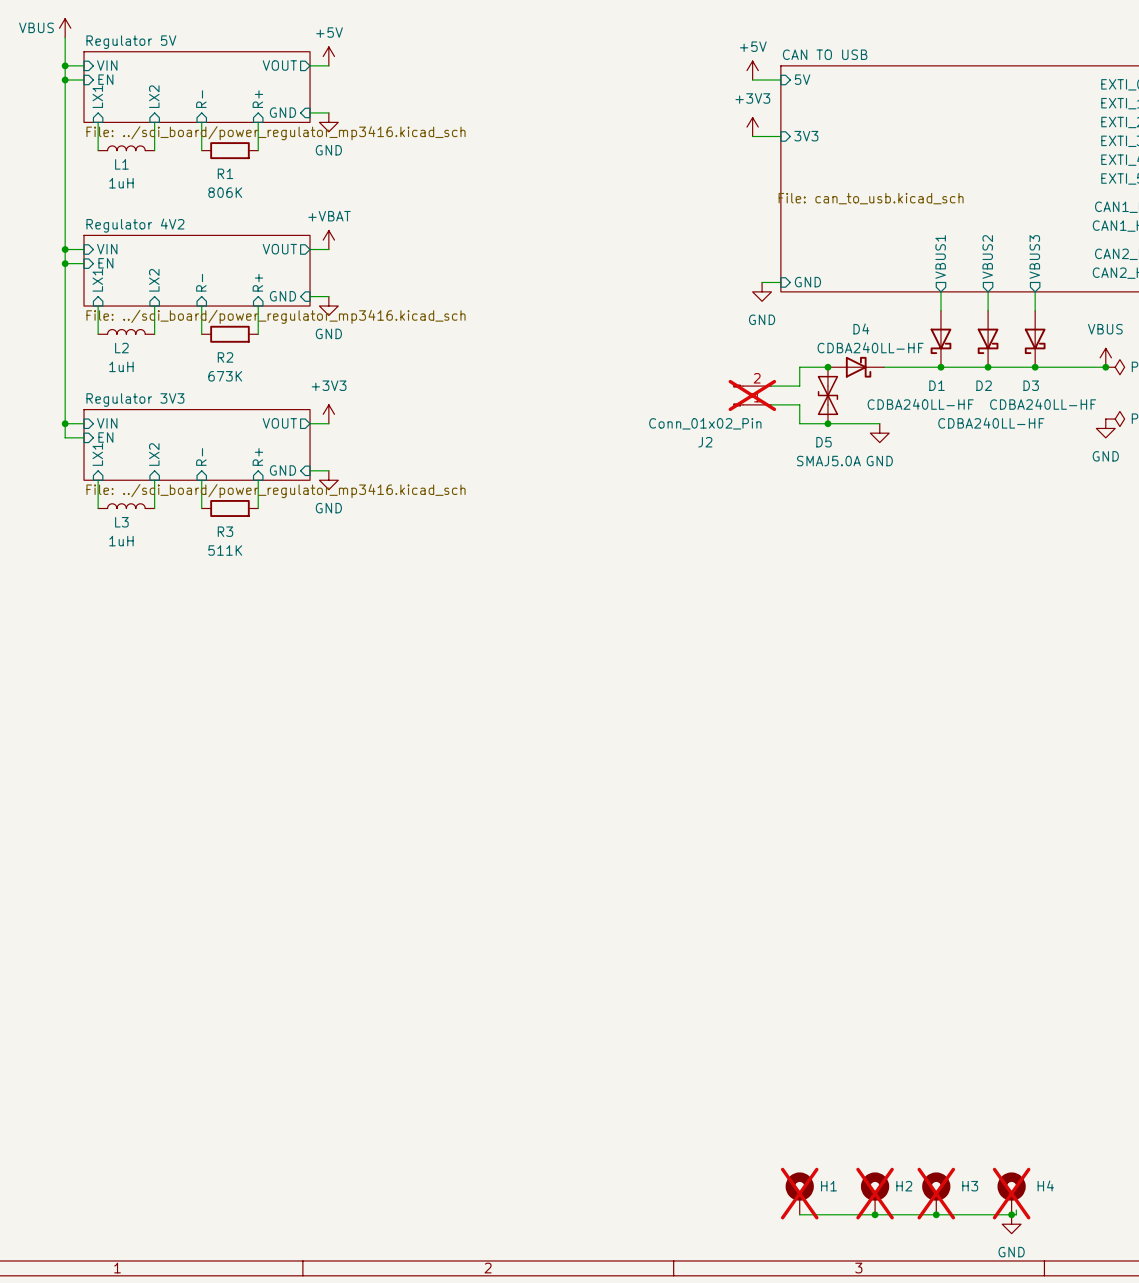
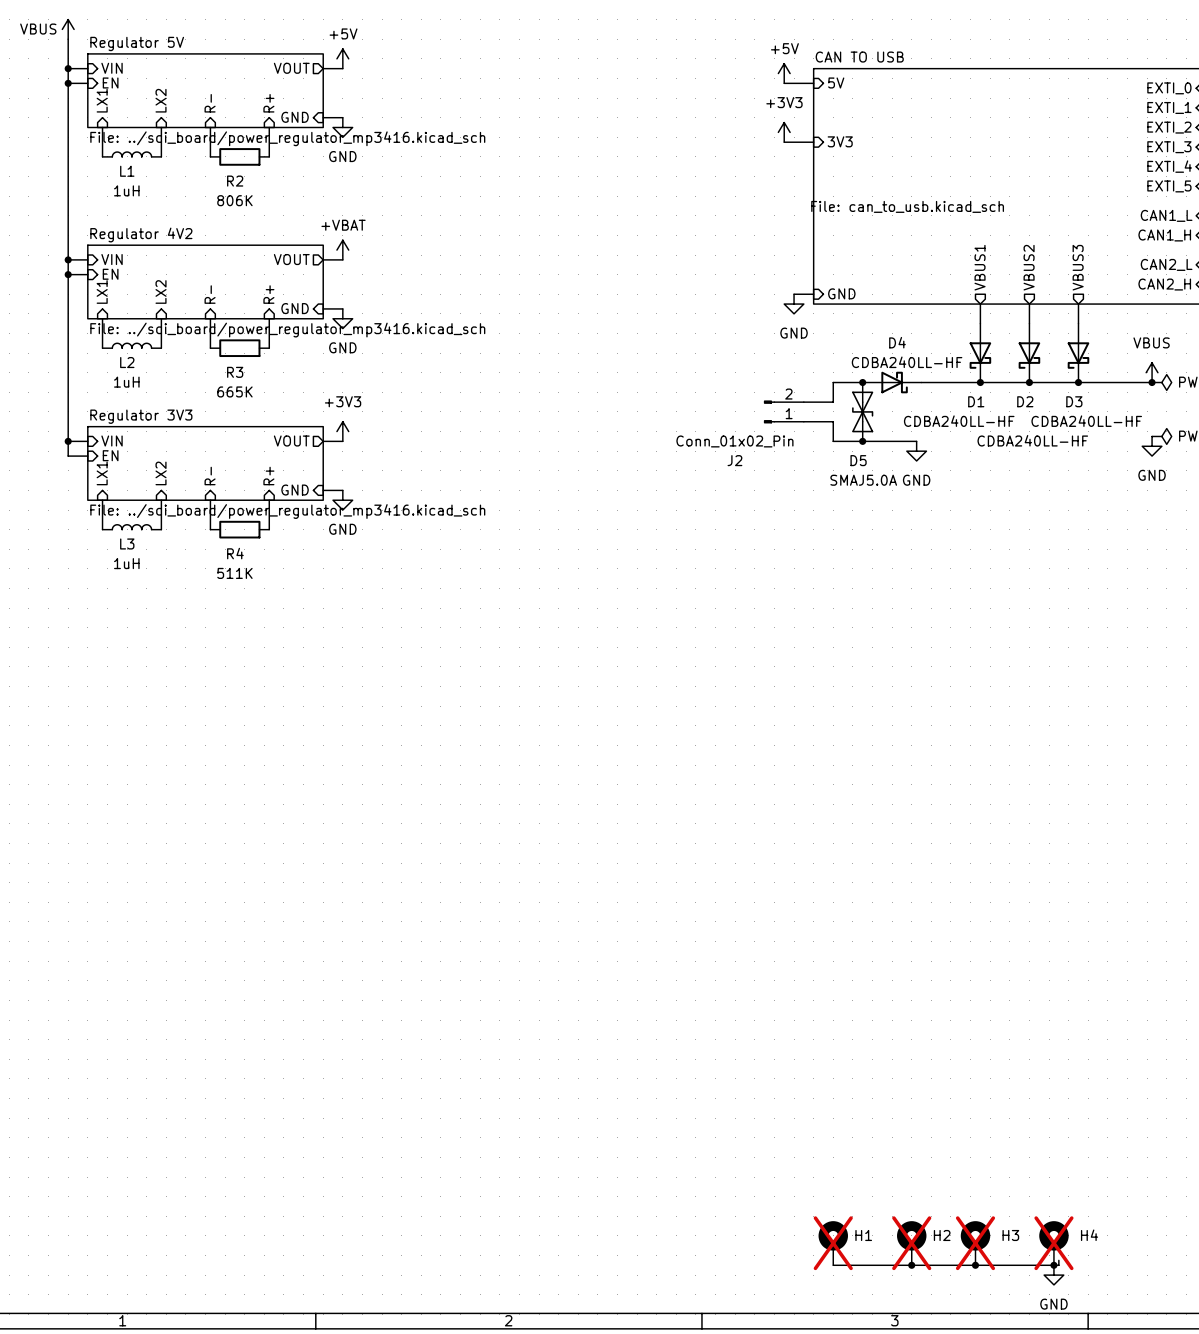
R1 name: R1 (225, 173) -> R2 (235, 181)
R2 name: R2 (225, 357) -> R3 (235, 372)
R2 value: 673K (225, 376) -> 665K (234, 391)
J2 do-not-place cross: (752, 395) -> none
R3 name: R3 (225, 531) -> R4 (235, 553)

